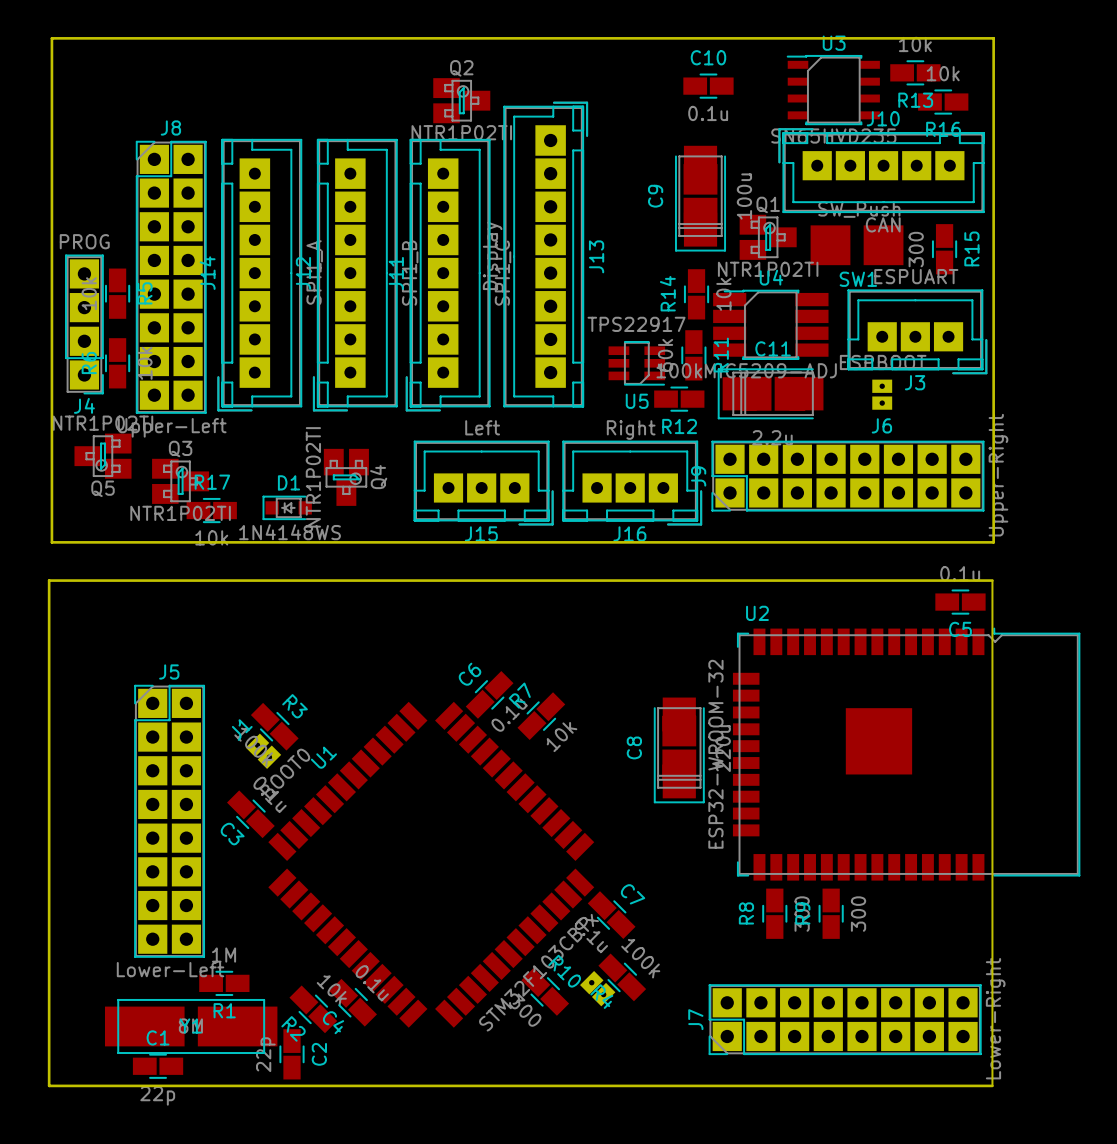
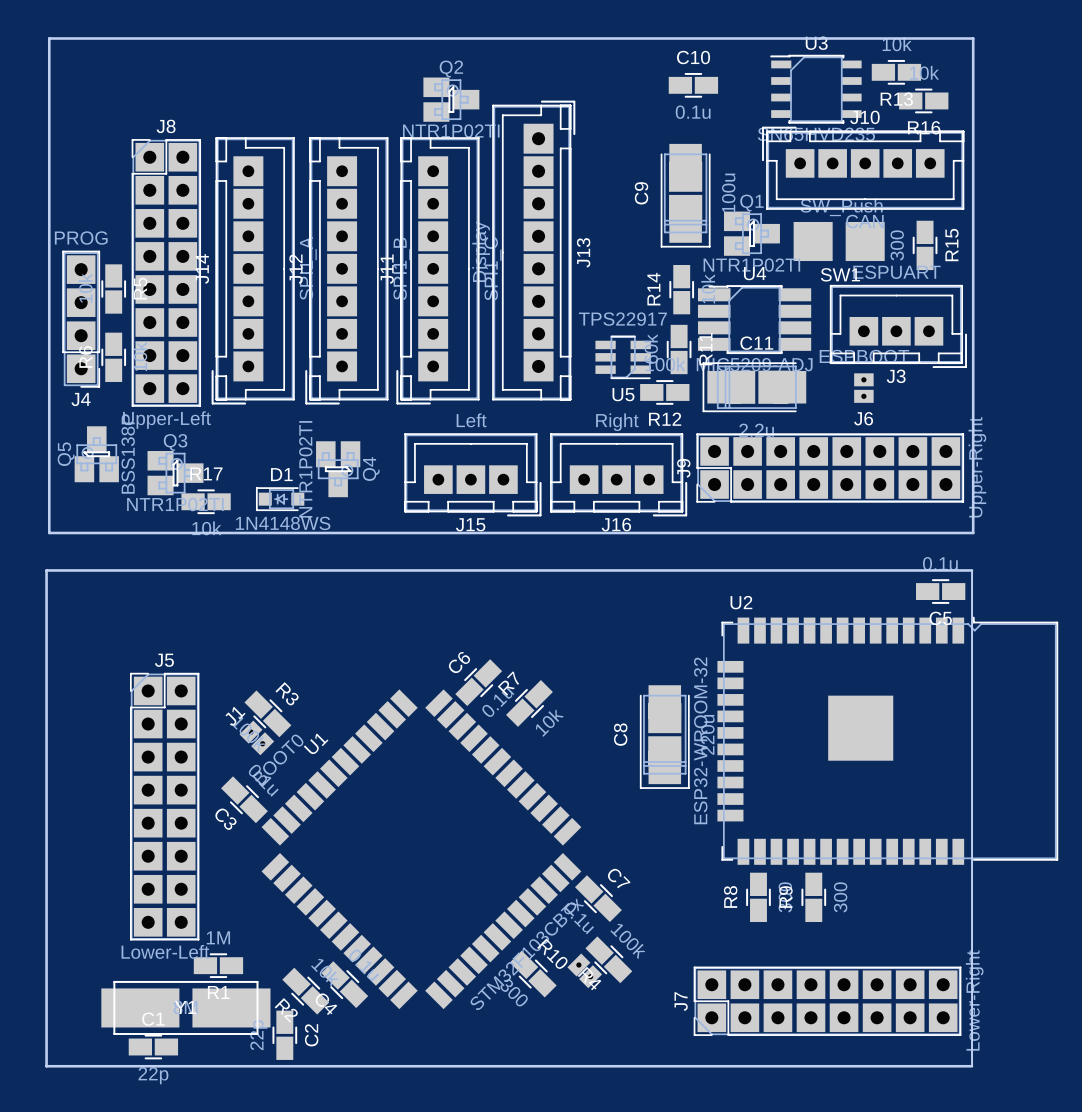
Q5 value: NTR1P02TI (103, 423) -> BSS138P (128, 453)
Q5 rotation: 0° (103, 456) -> 90° clockwise (96, 454)

